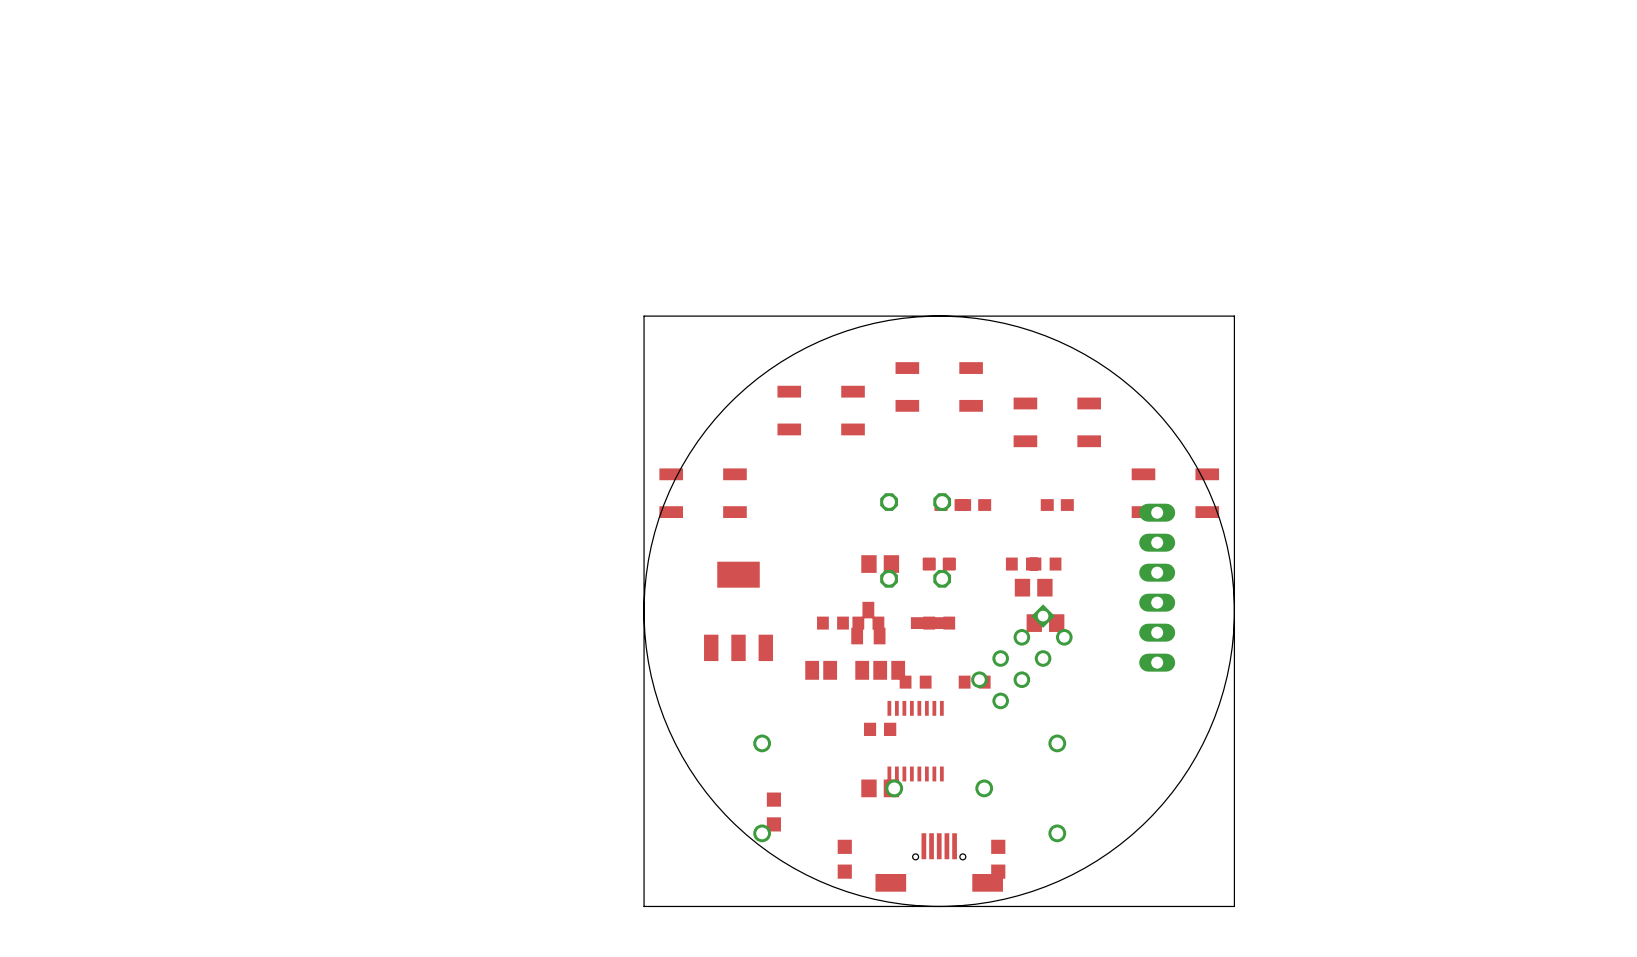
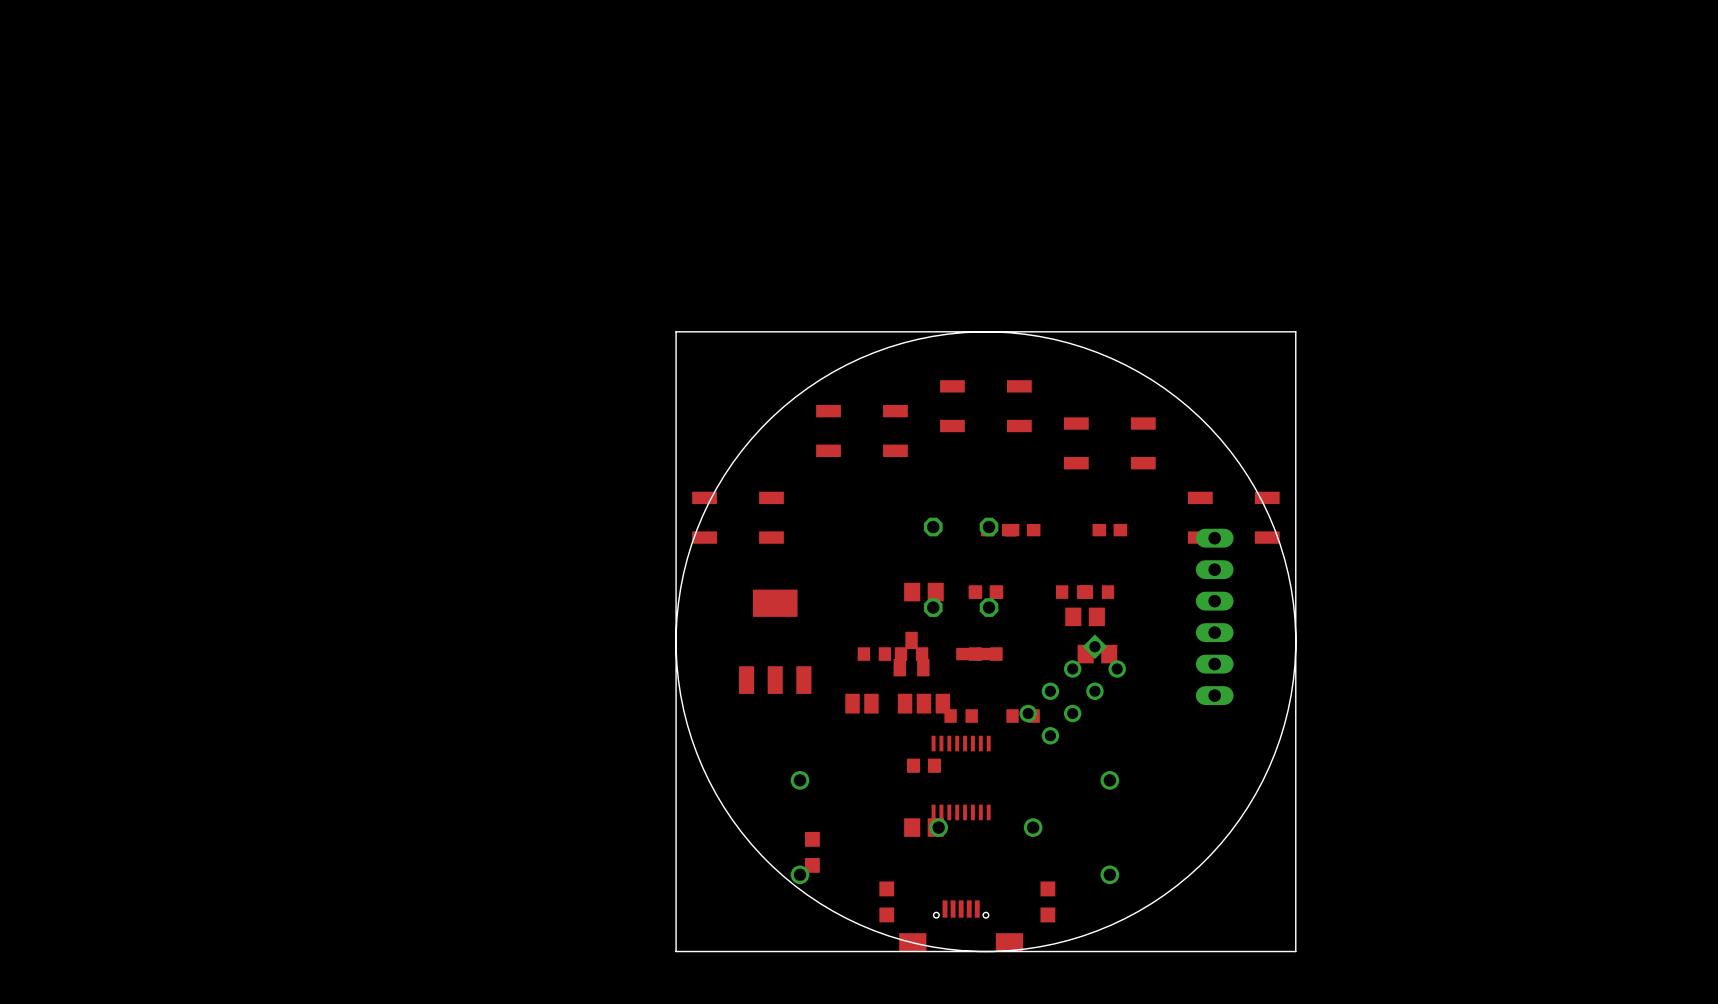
part: (939, 862) -> none
part: none -> (961, 926)

